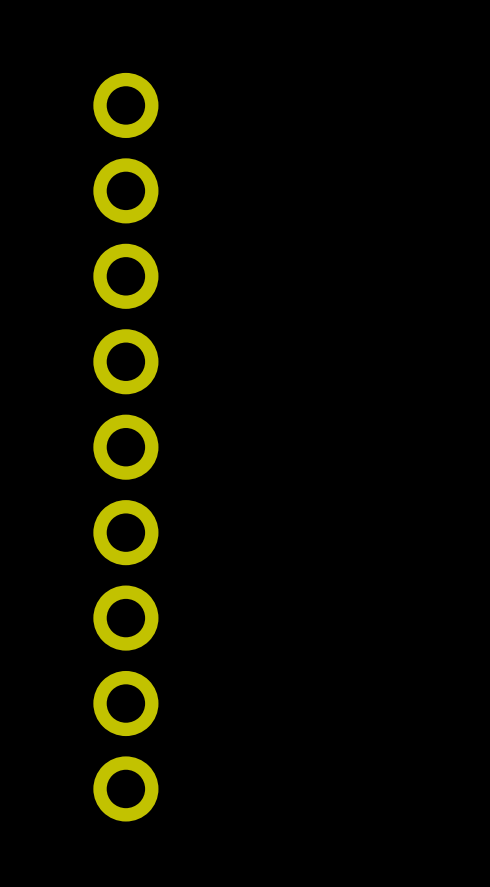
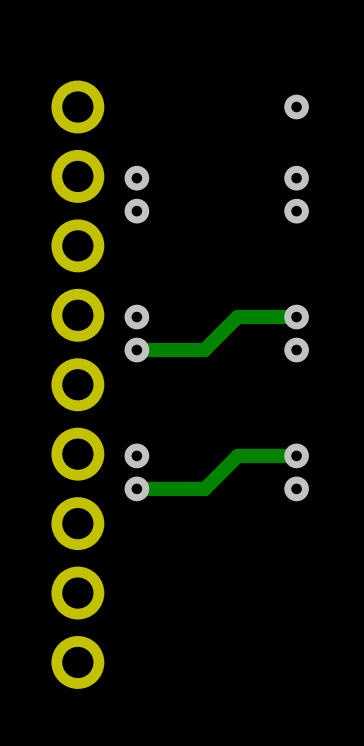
via: none -> (296, 107)
via: none -> (136, 178)
via: none -> (296, 178)
via: none -> (136, 211)
via: none -> (296, 211)
via: none -> (136, 317)
track: none -> (296, 317) (237, 317) (204, 350) (136, 350)
via: none -> (296, 317)
via: none -> (136, 350)
via: none -> (296, 350)
via: none -> (136, 455)
track: none -> (296, 455) (237, 455) (204, 488) (136, 488)
via: none -> (296, 455)
via: none -> (136, 488)
via: none -> (296, 488)

